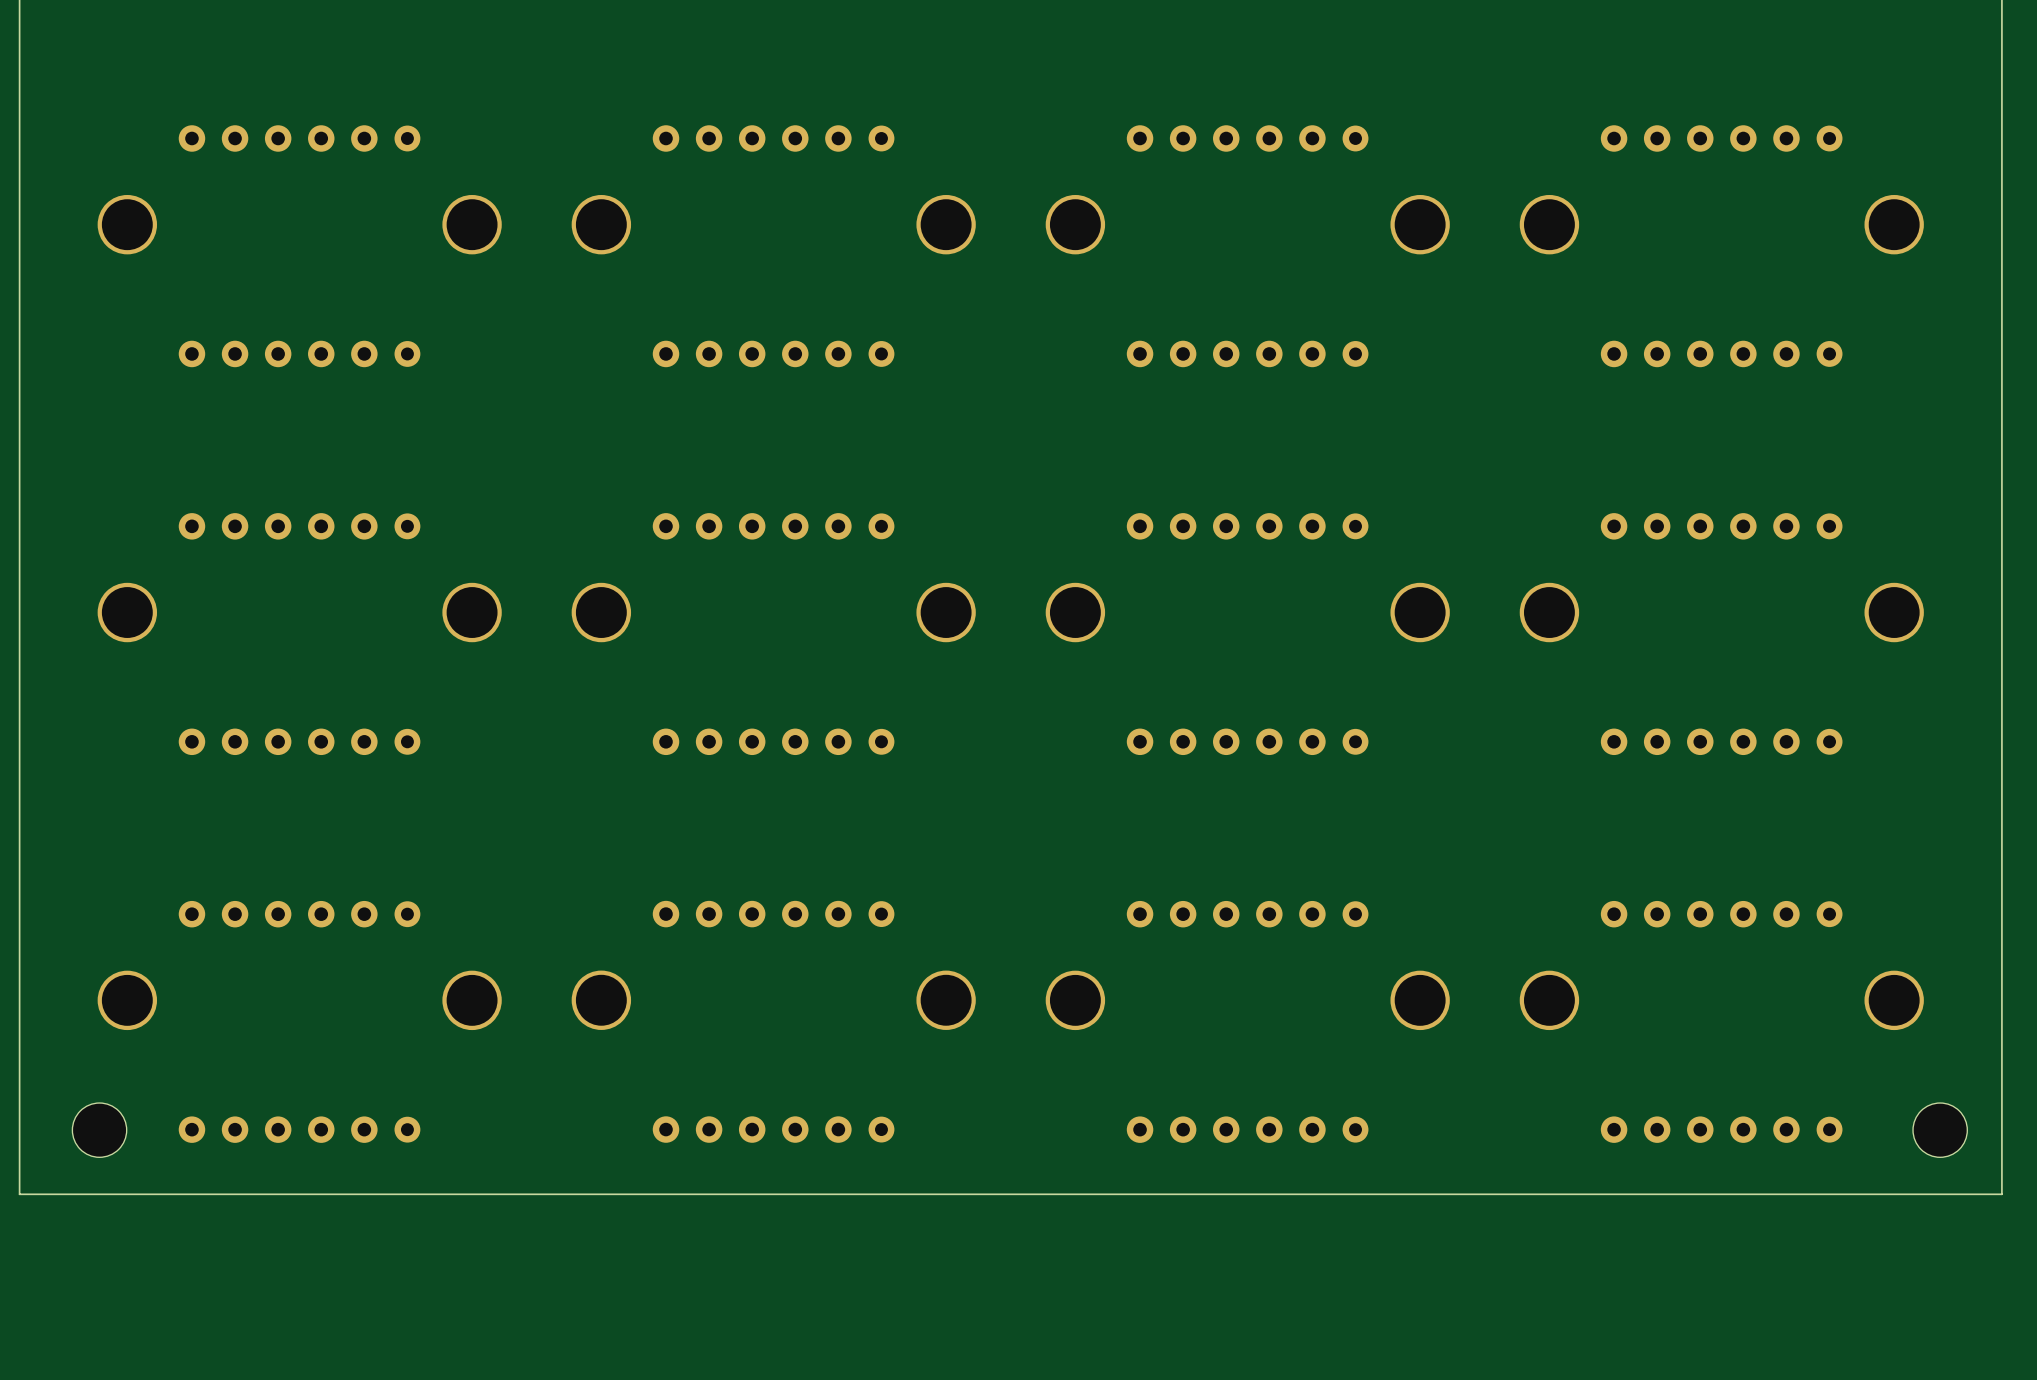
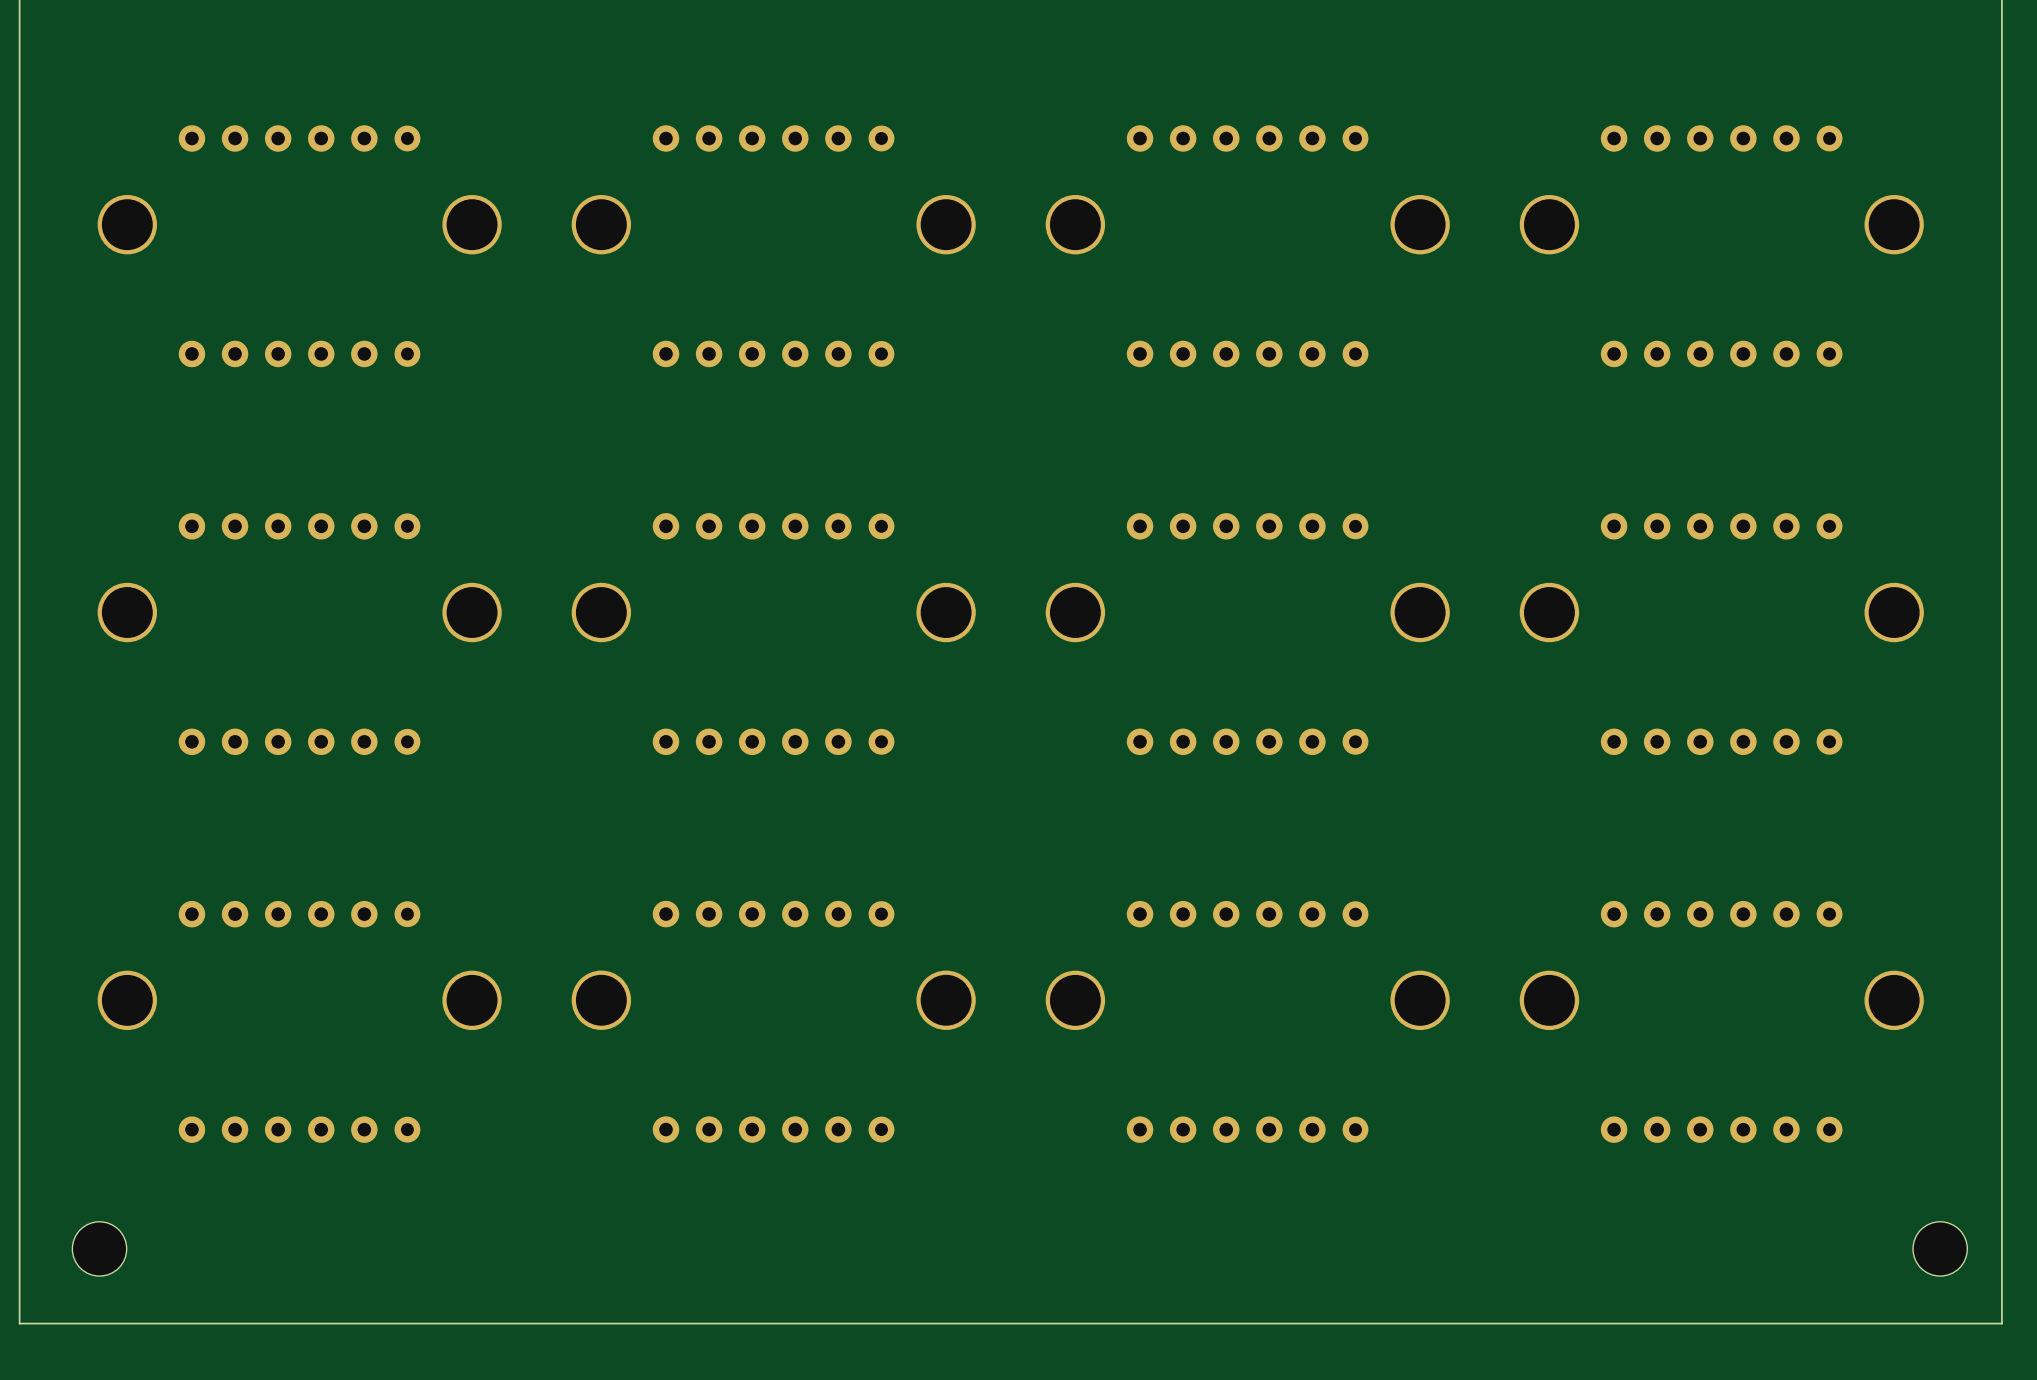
part position: (99, 1130) -> (99, 1248)
part position: (1940, 1130) -> (1940, 1248)
board edge: (2001, 1194) (19, 1194) -> (2001, 1194) (2001, 1323) (19, 1323) (19, 1194)

